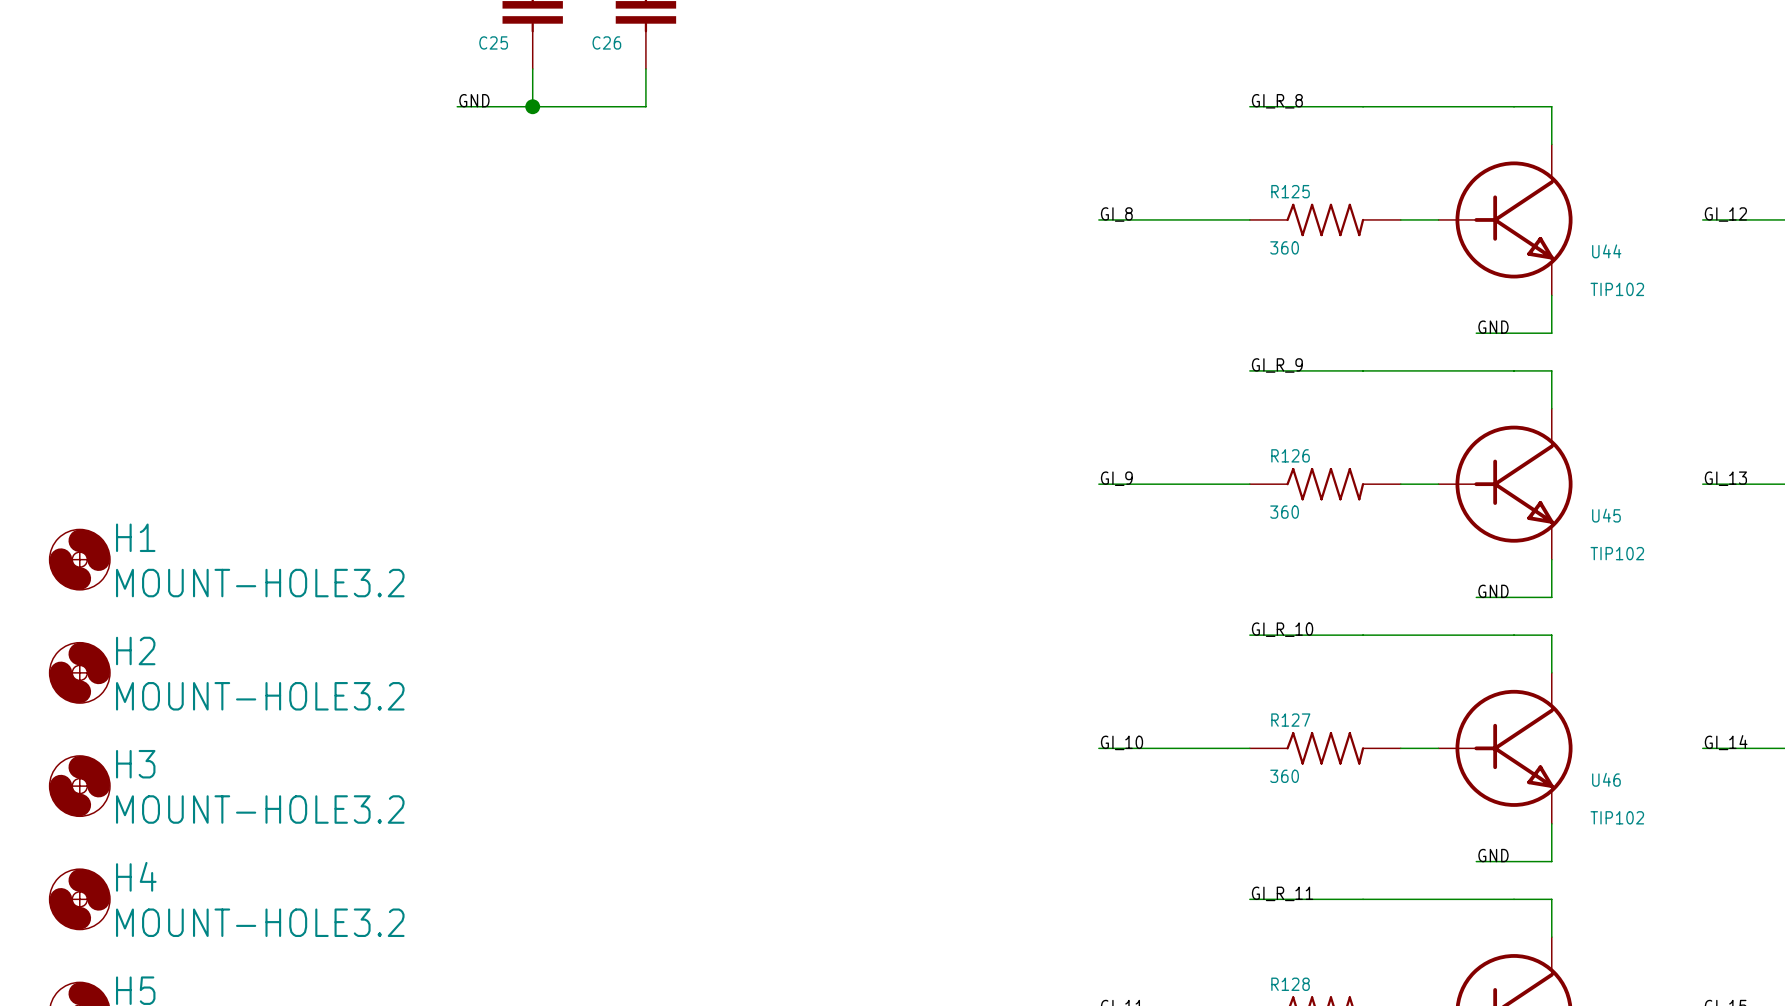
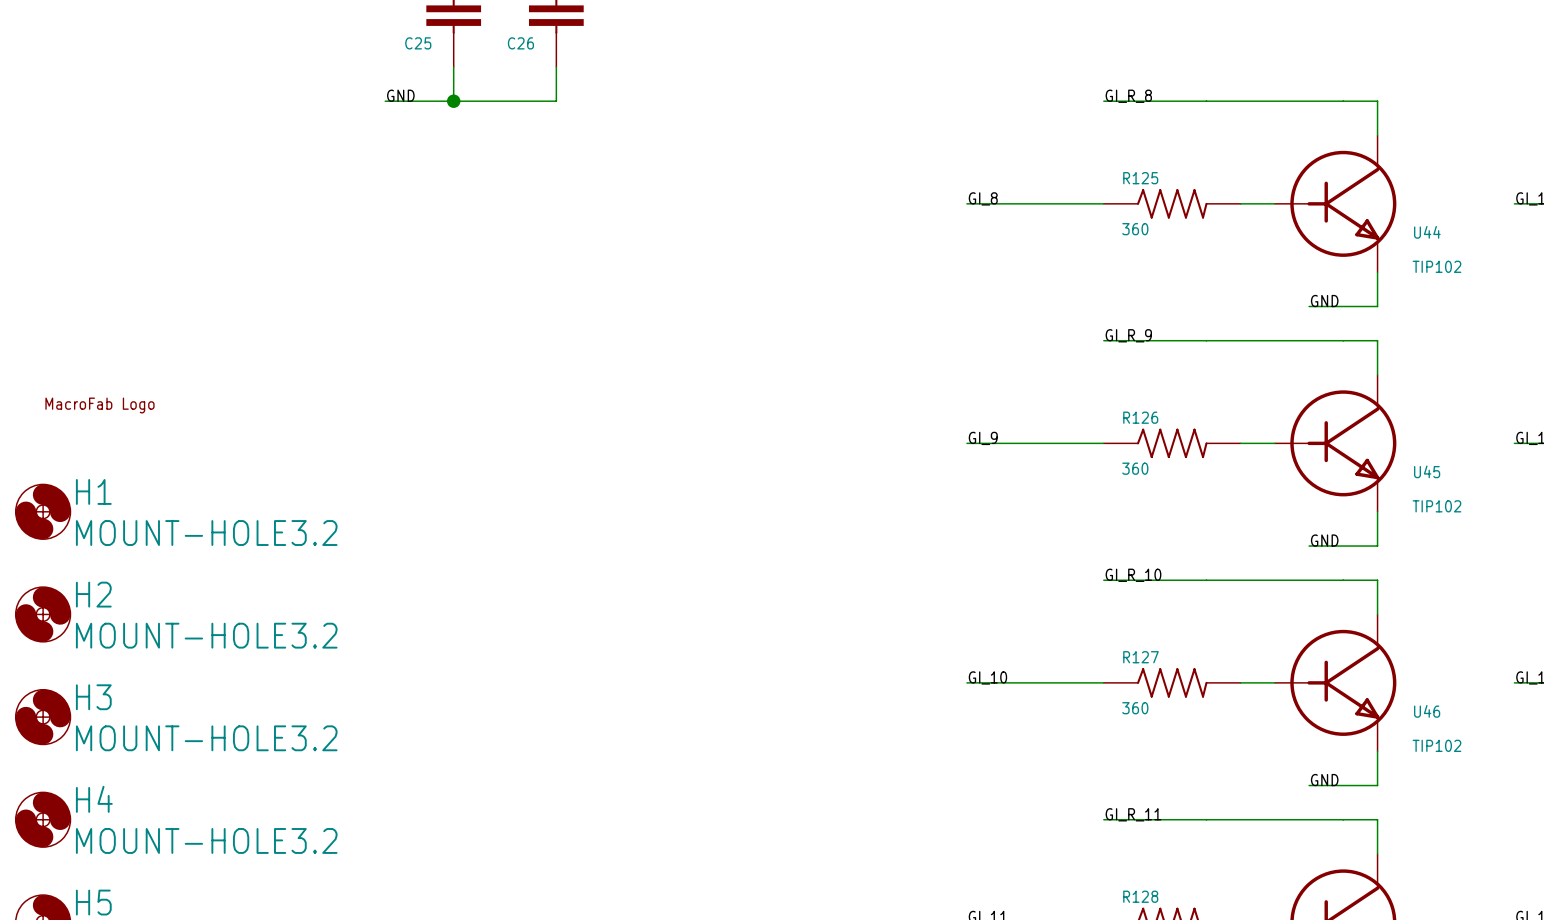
part: none -> (99, 405)

